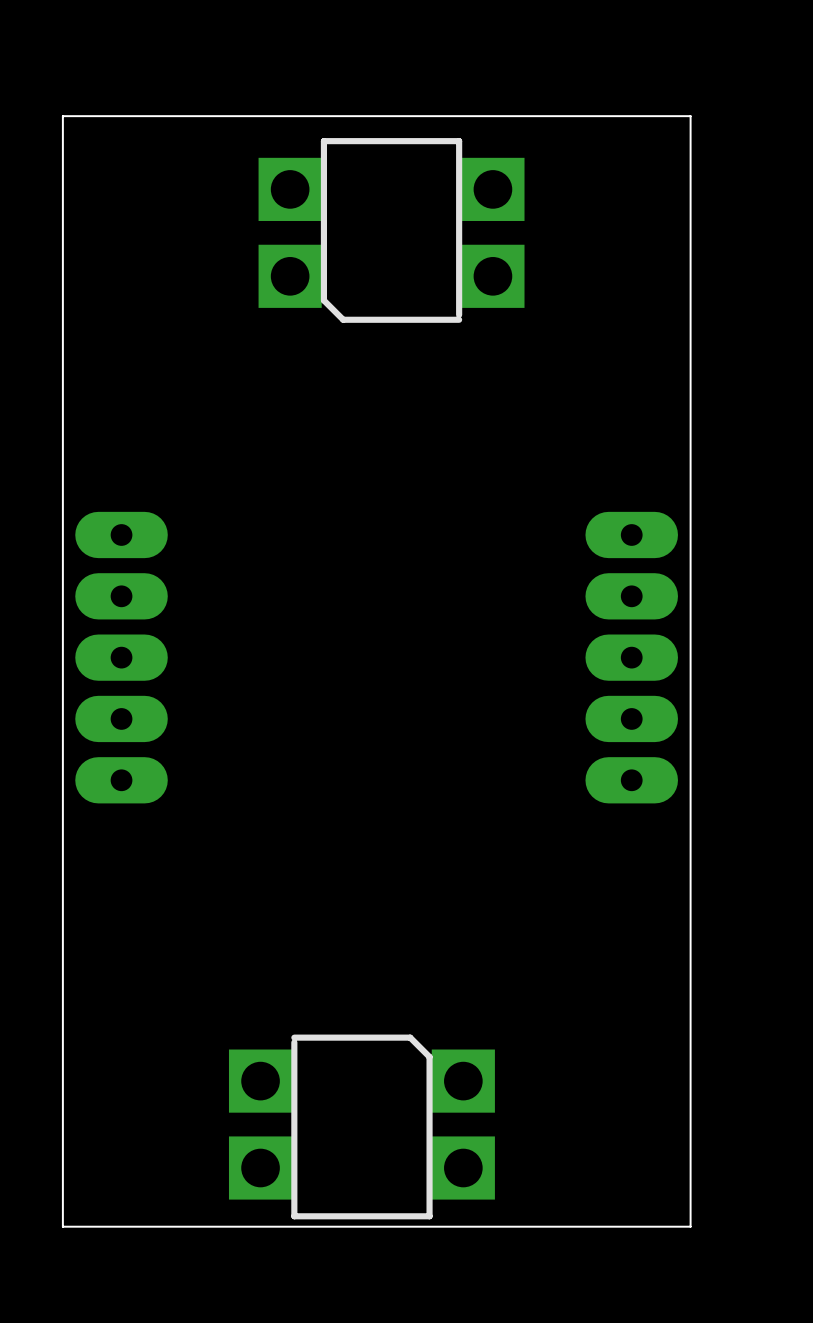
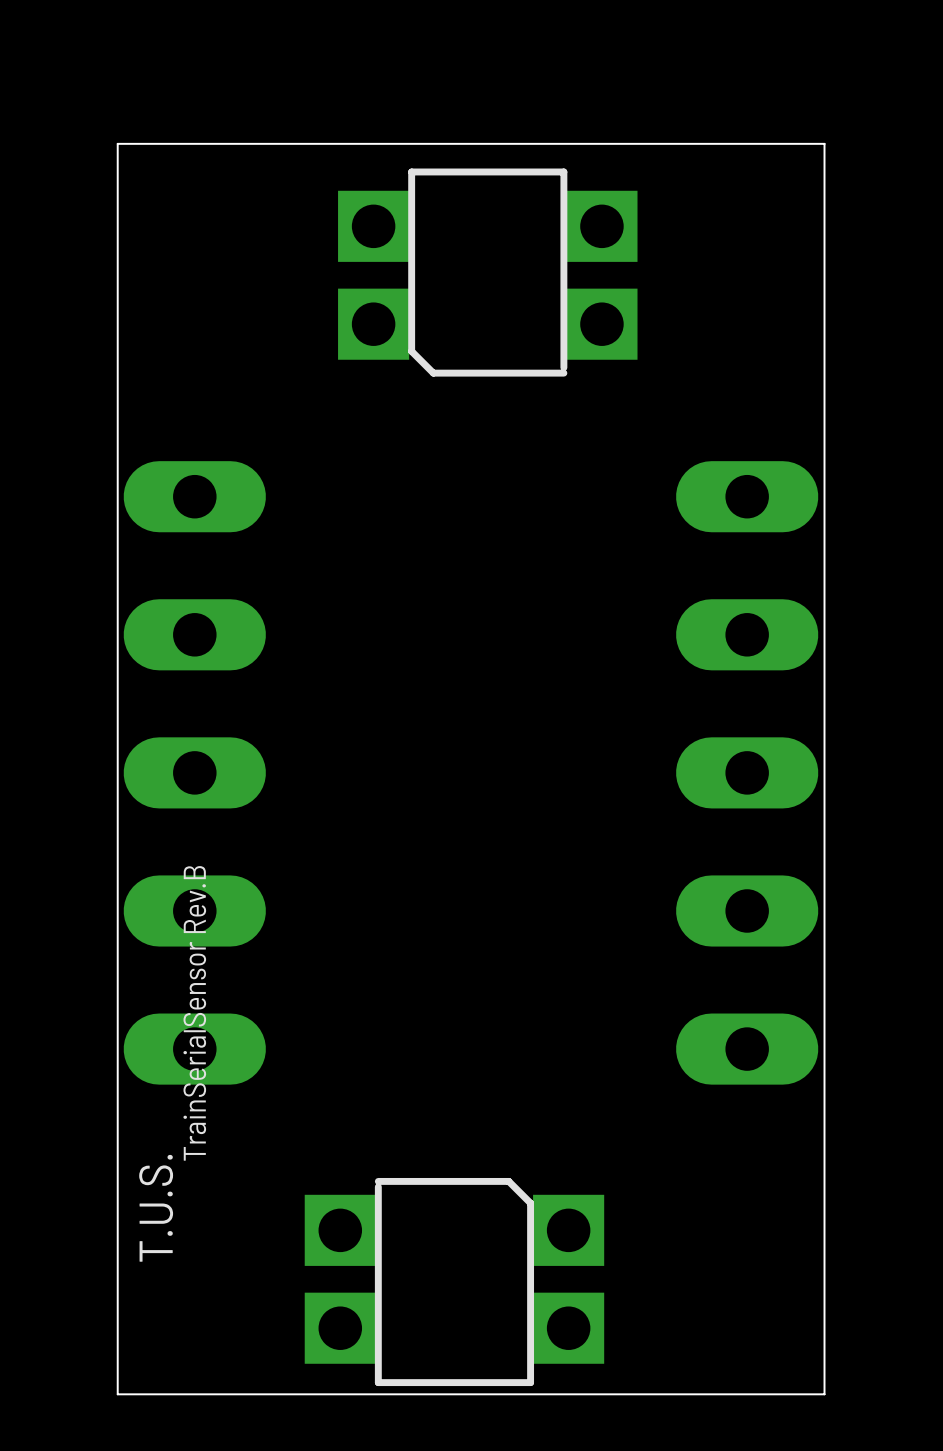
part footprint: [75, 511, 168, 804] -> [123, 461, 266, 1085]
part footprint: [585, 511, 678, 804] -> [676, 461, 819, 1085]
text: none -> TrainSerialSensor Rev.B (194, 1013)
text: none -> T.U.S. (156, 1208)

